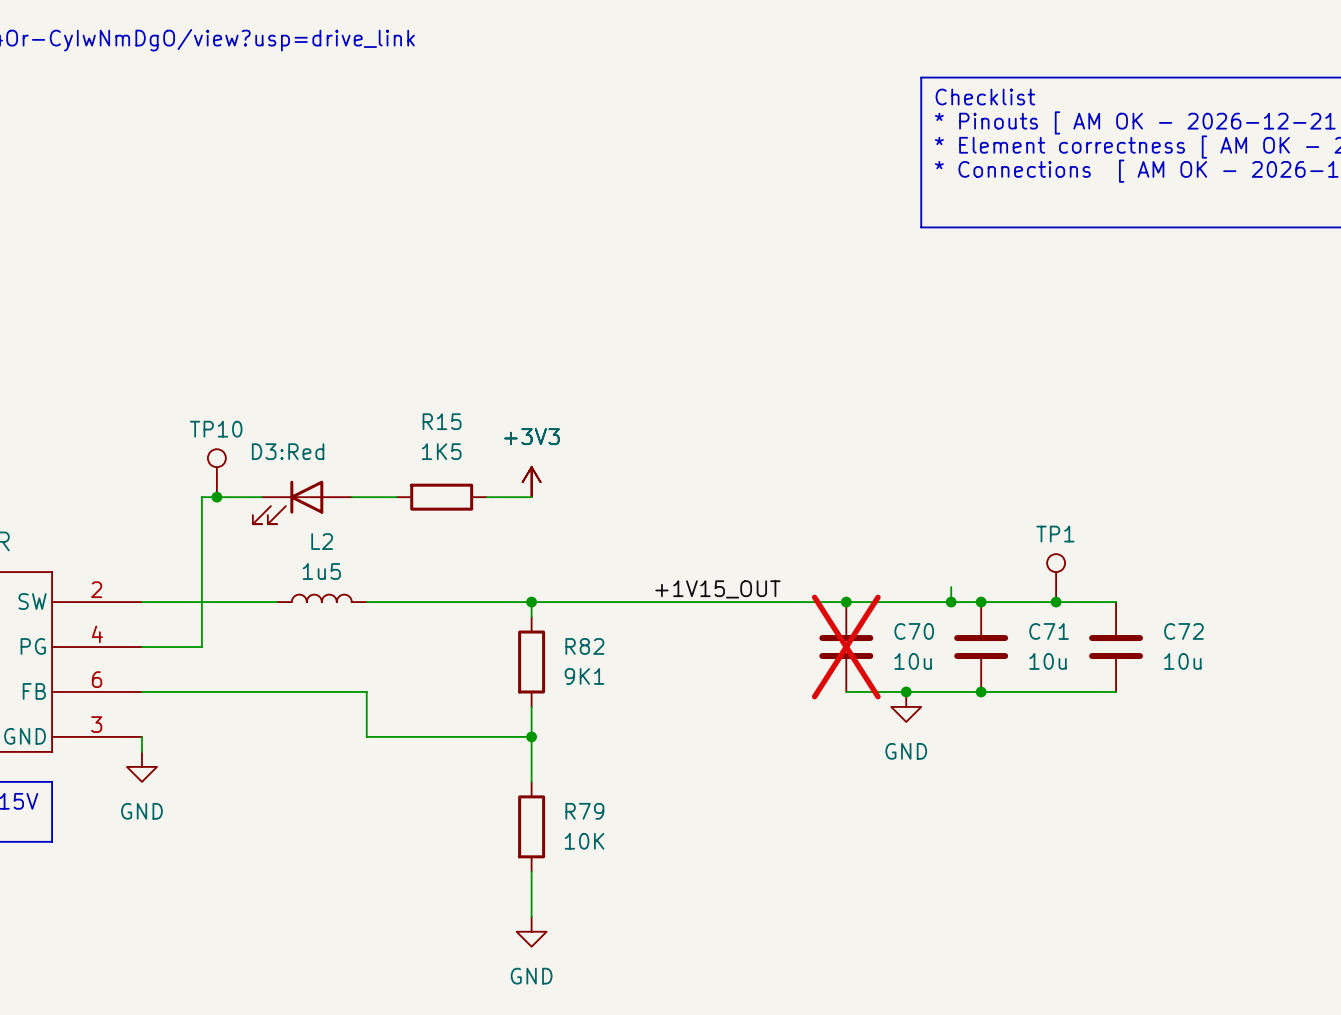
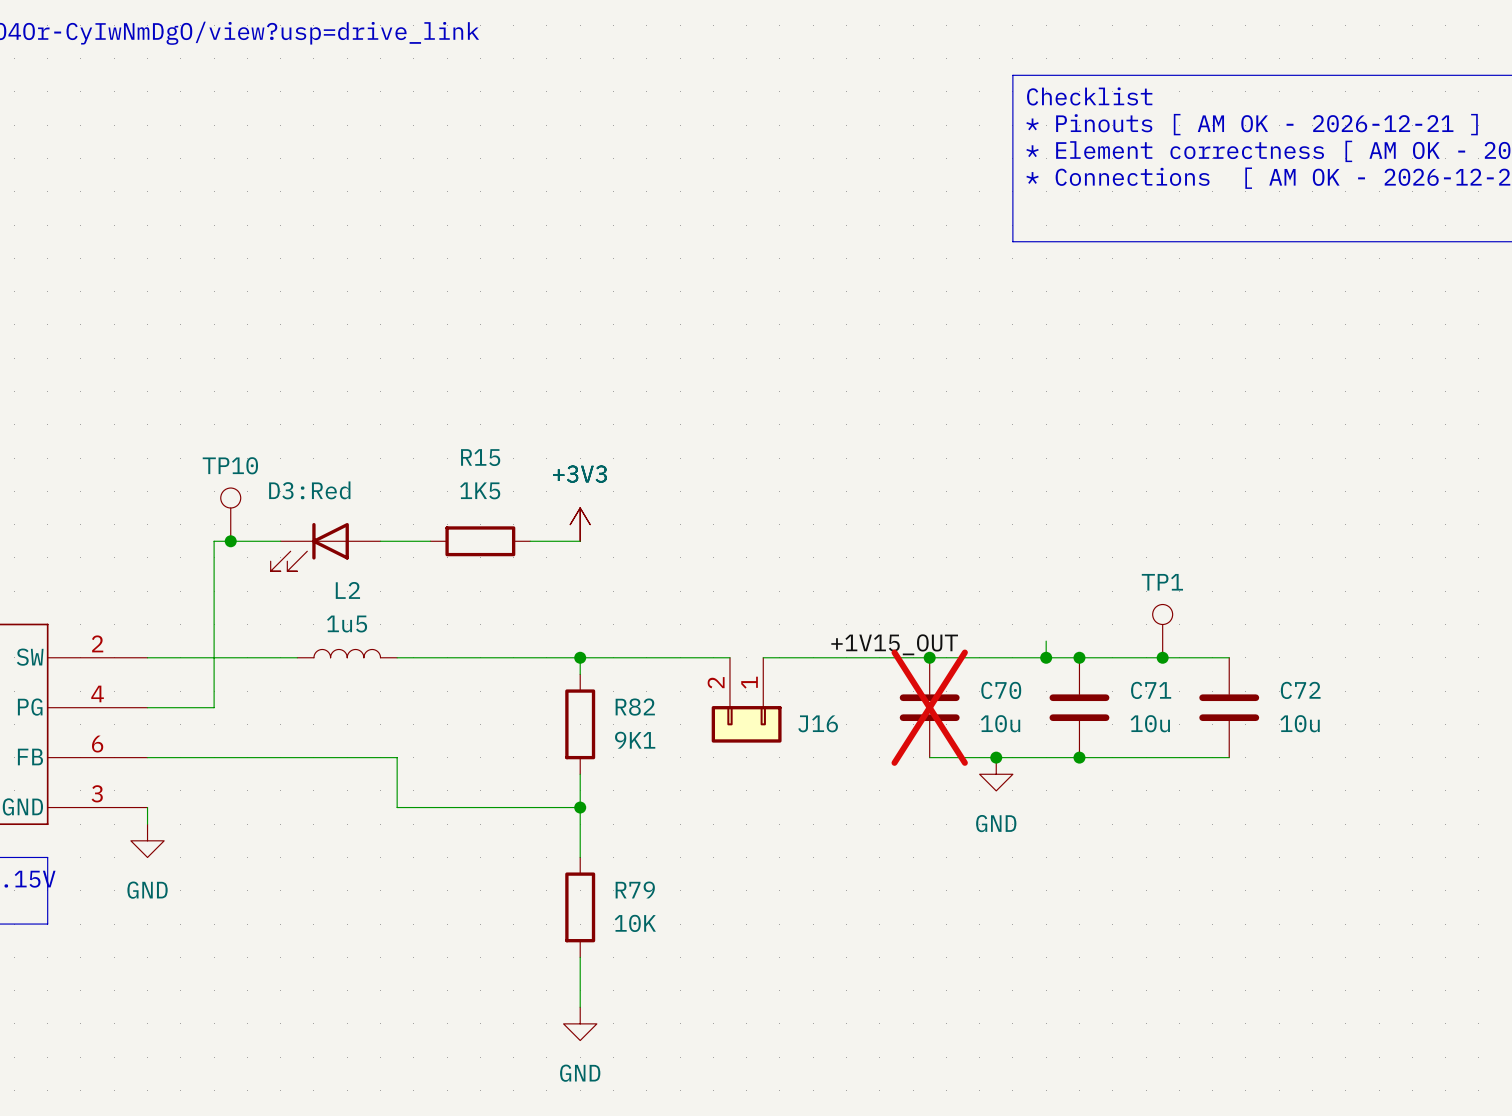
label position: +1V15_OUT (717, 589) -> +1V15_OUT (894, 644)
wire: (666, 602) (696, 602) -> none
J16: none -> (746, 700)

